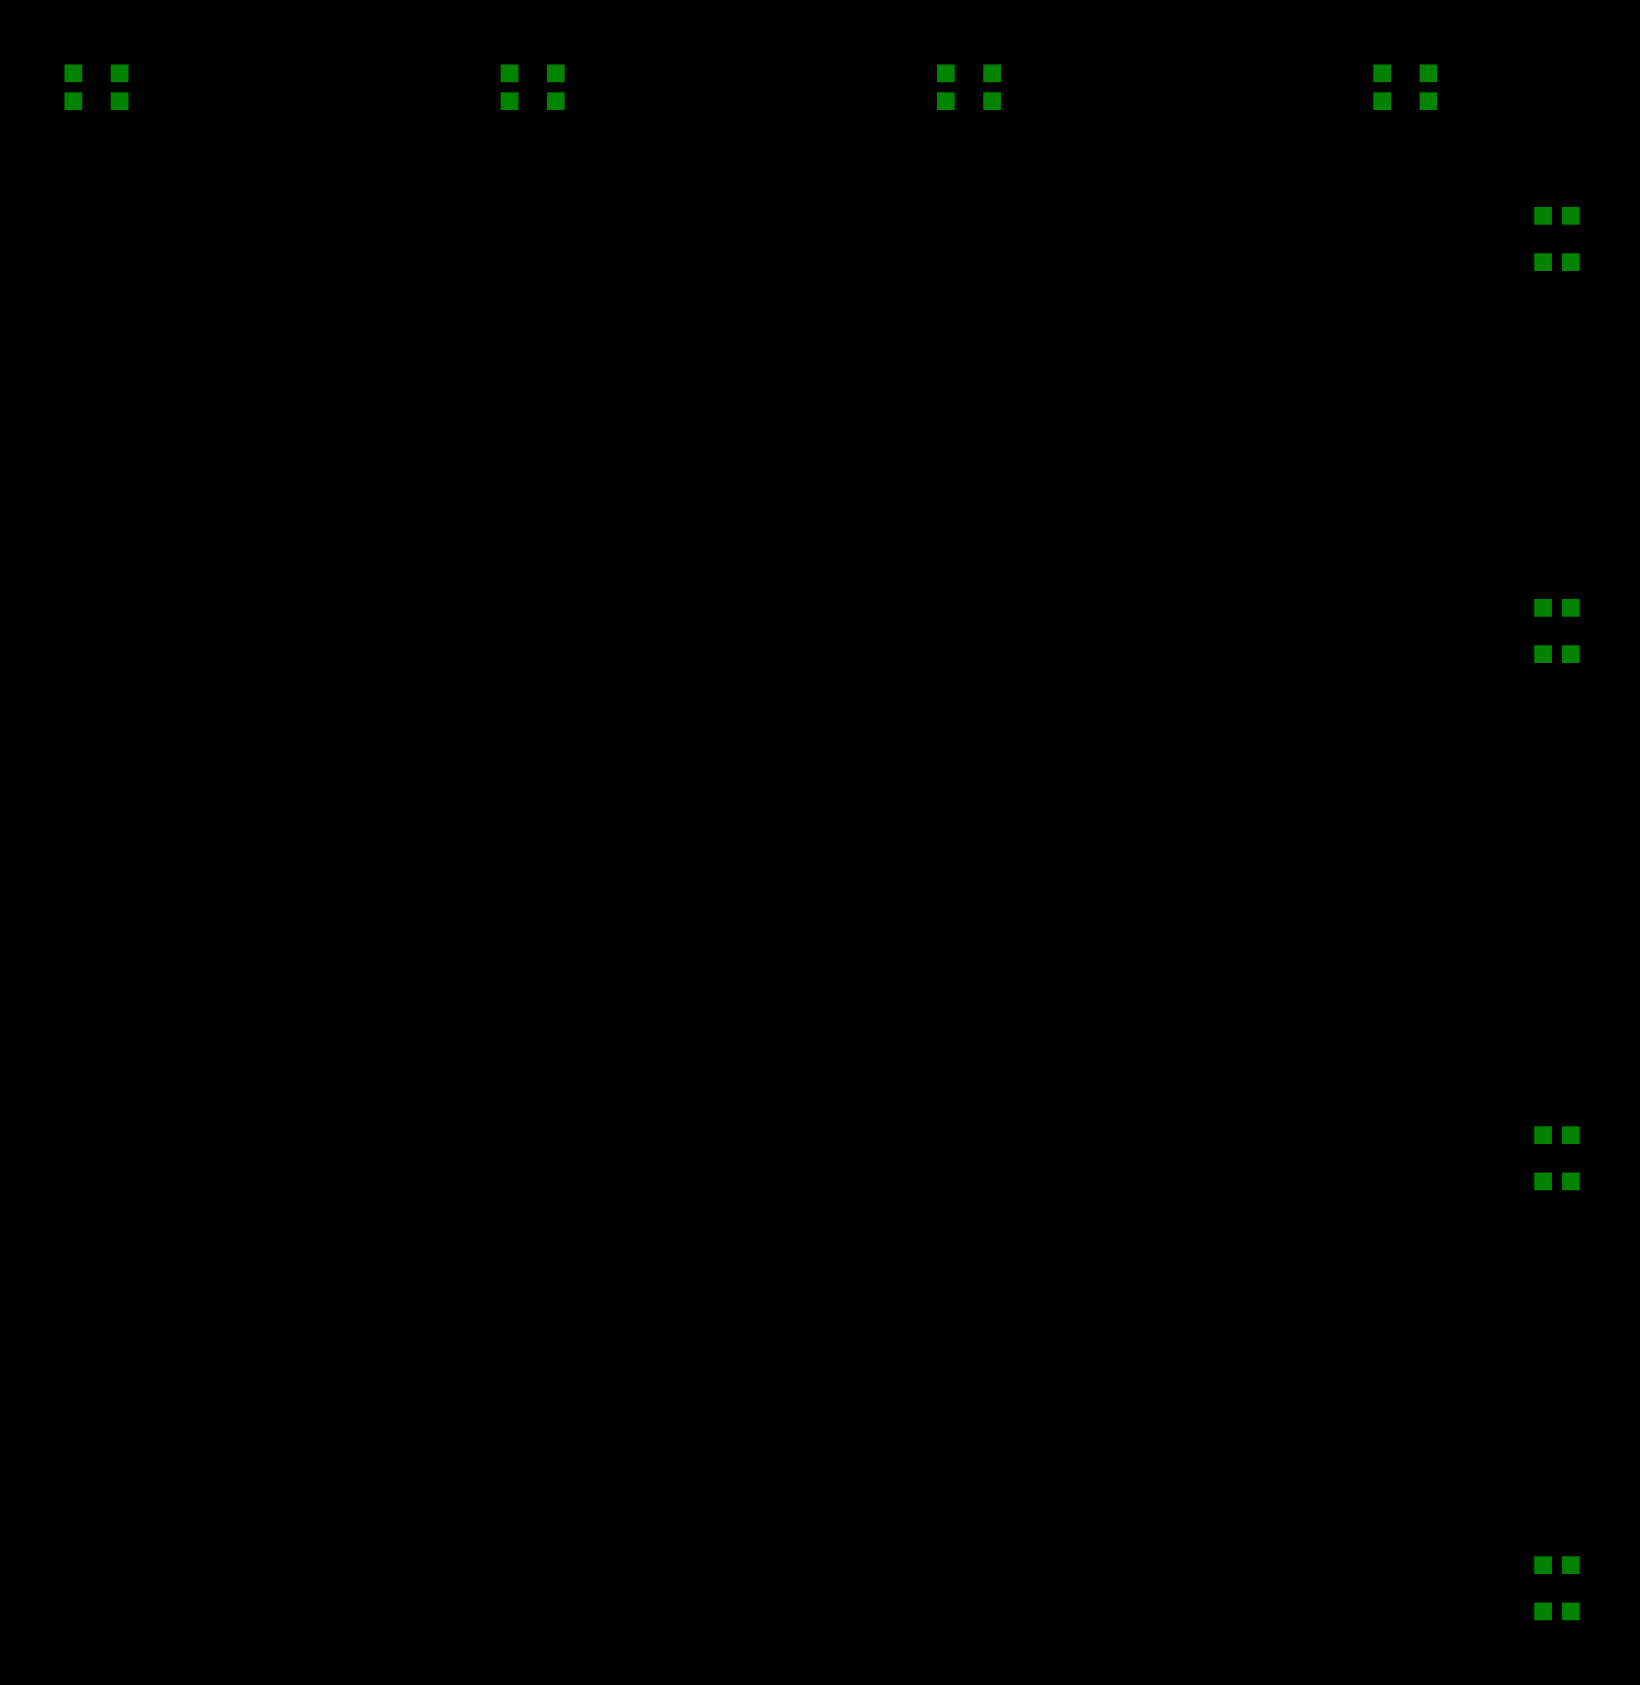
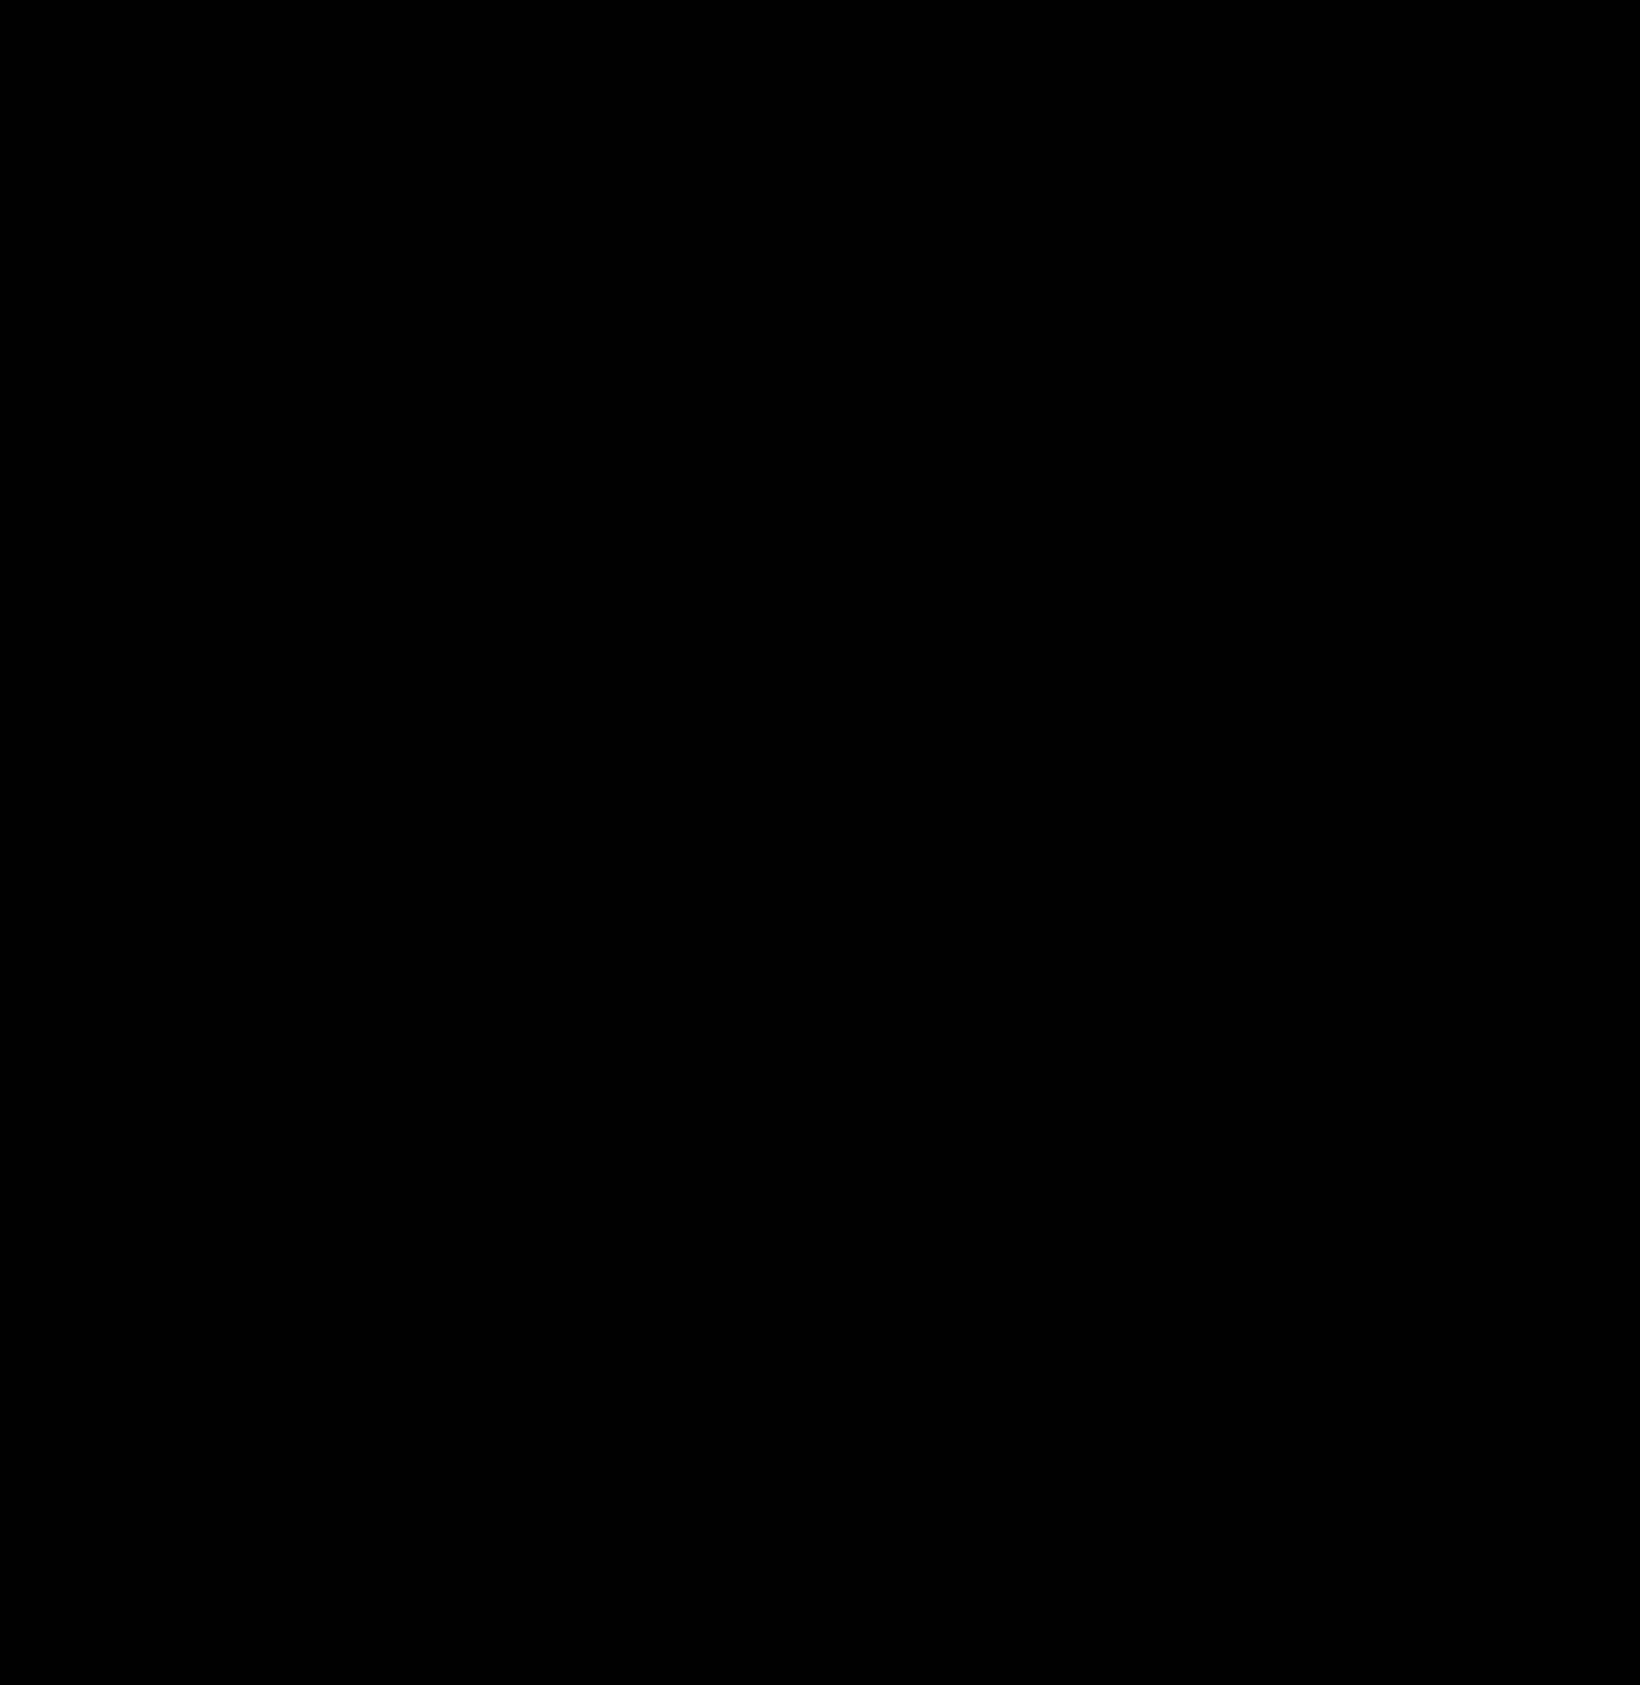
part: (96, 87) -> none
part: (532, 87) -> none
part: (968, 87) -> none
part: (1405, 87) -> none
part: (1557, 238) -> none
part: (1557, 630) -> none
part: (1557, 1158) -> none
part: (1557, 1588) -> none

